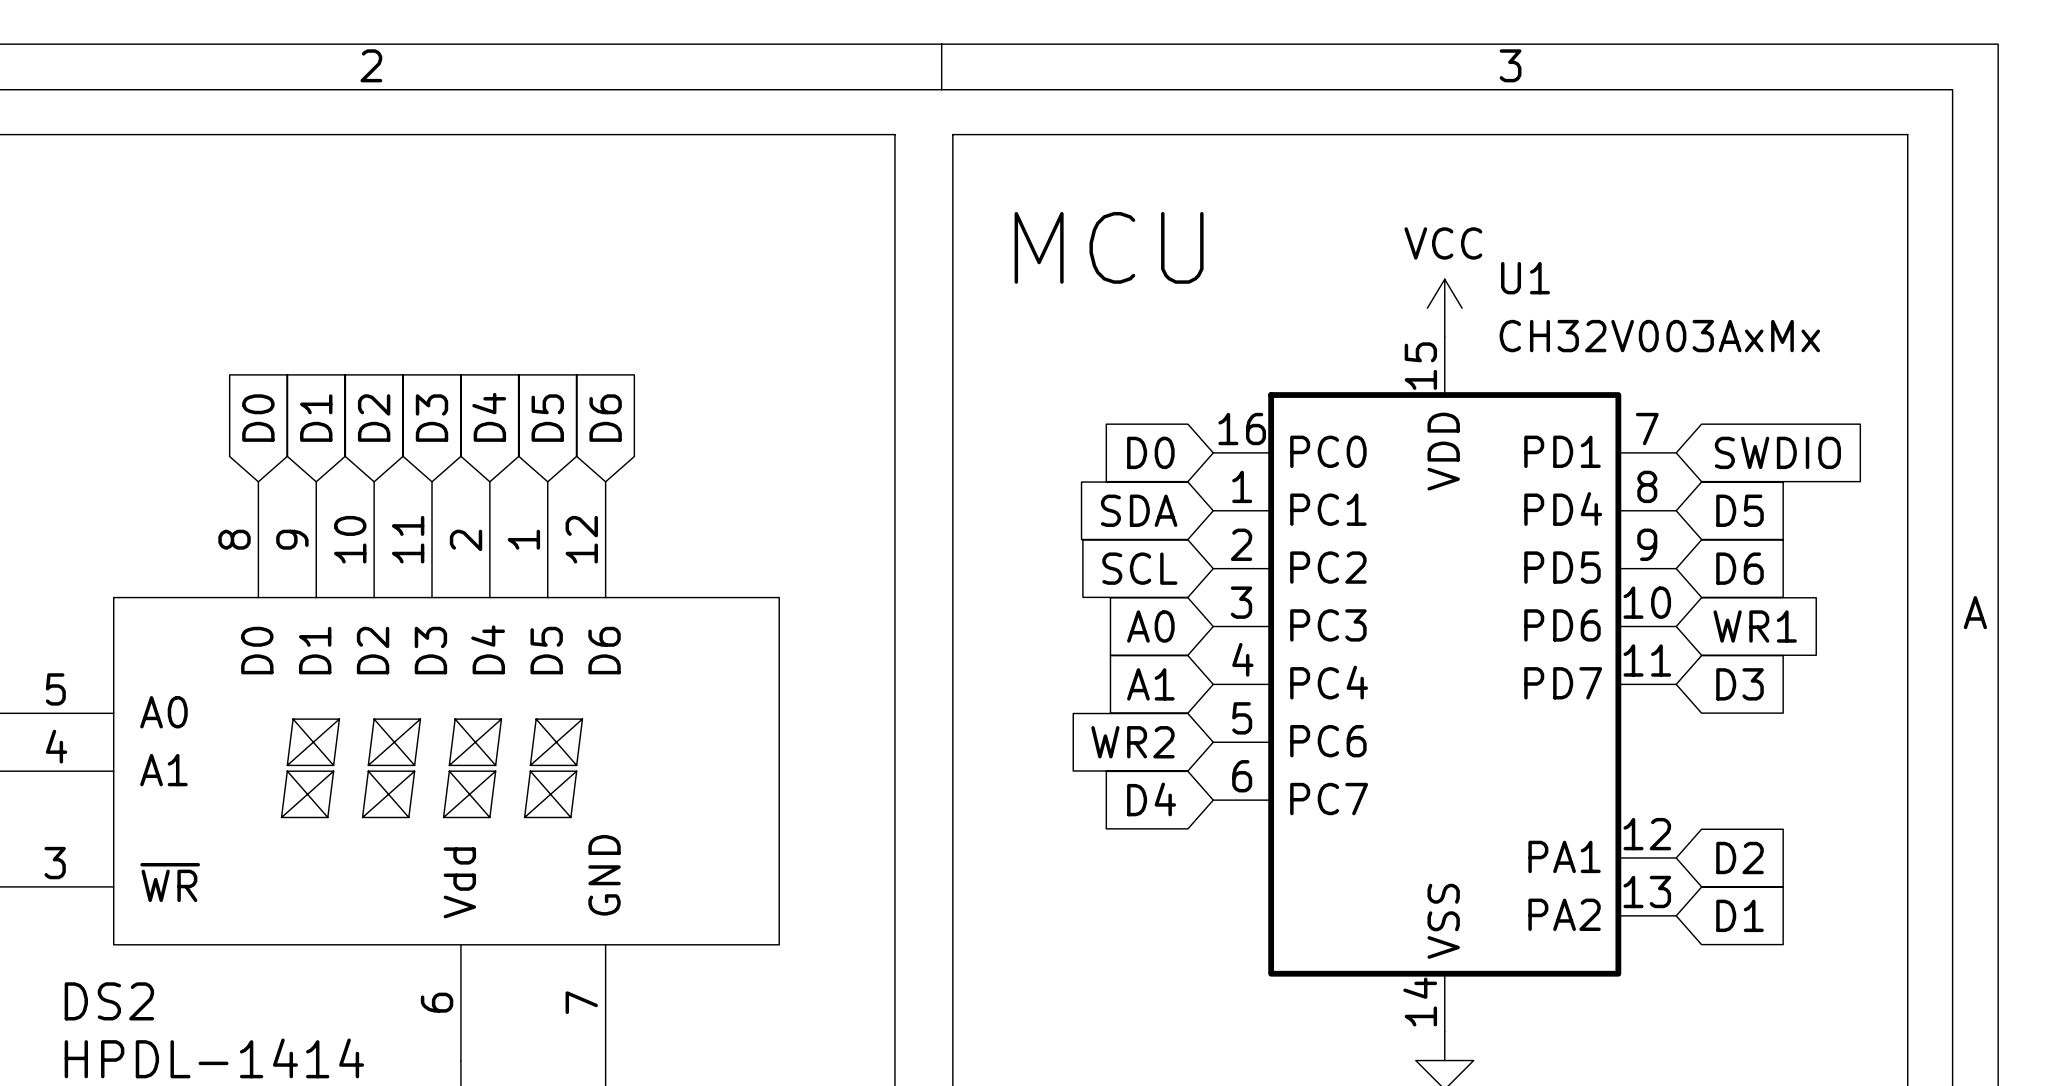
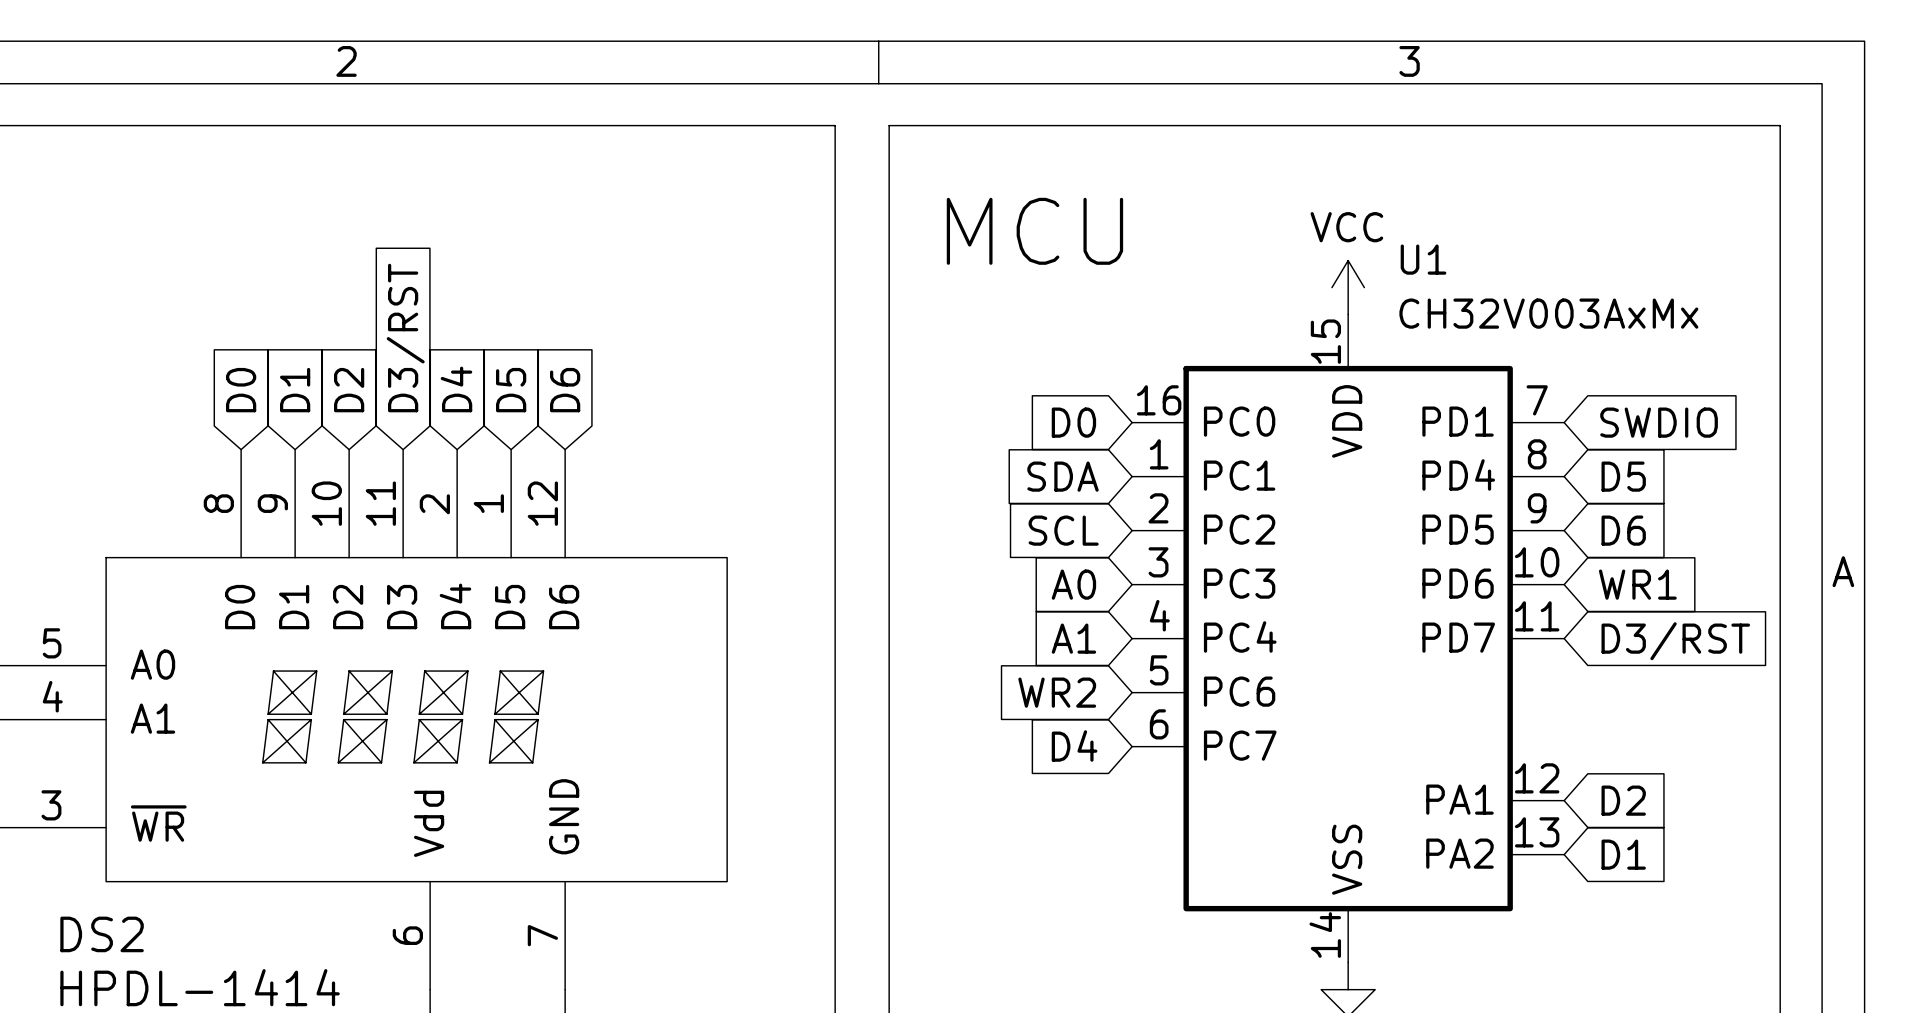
global label: D3 (432, 418) -> D3/RST (405, 338)
global label: D3 (1740, 684) -> D3/RST (1675, 641)

